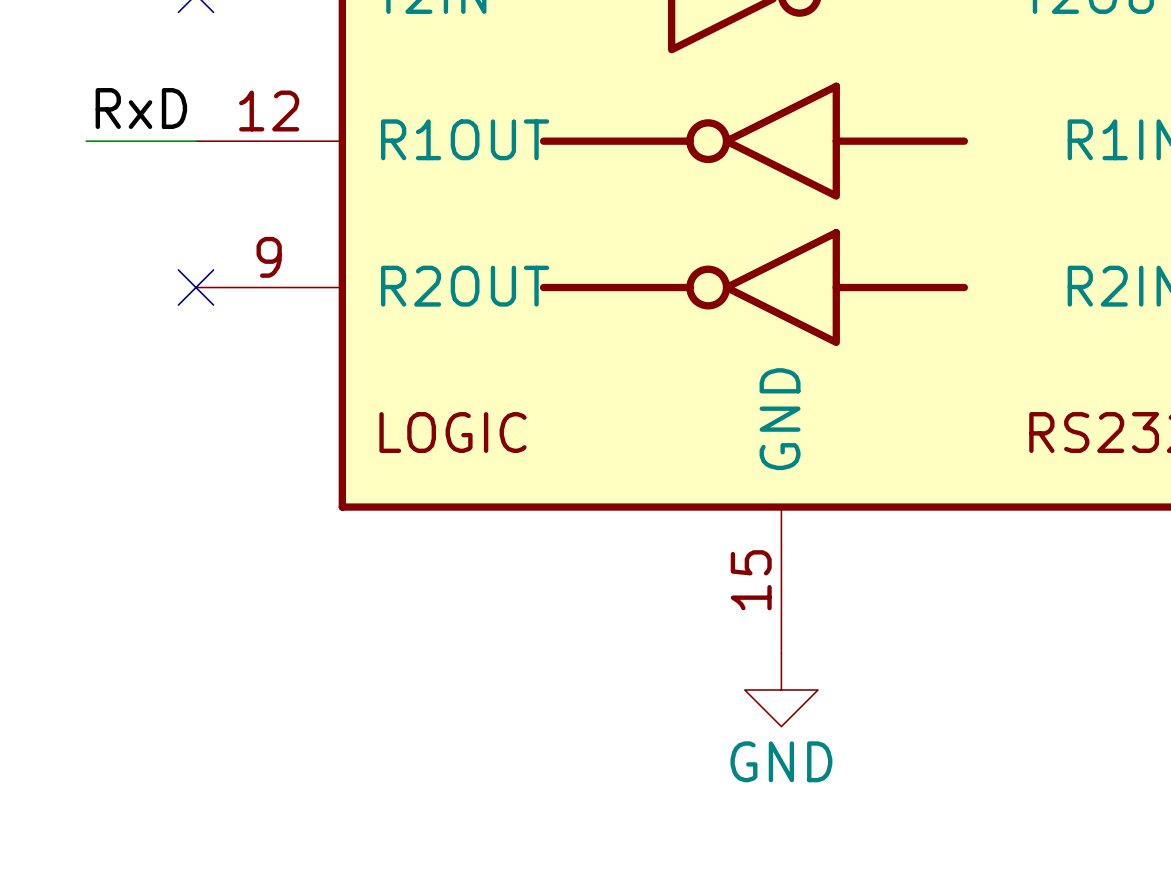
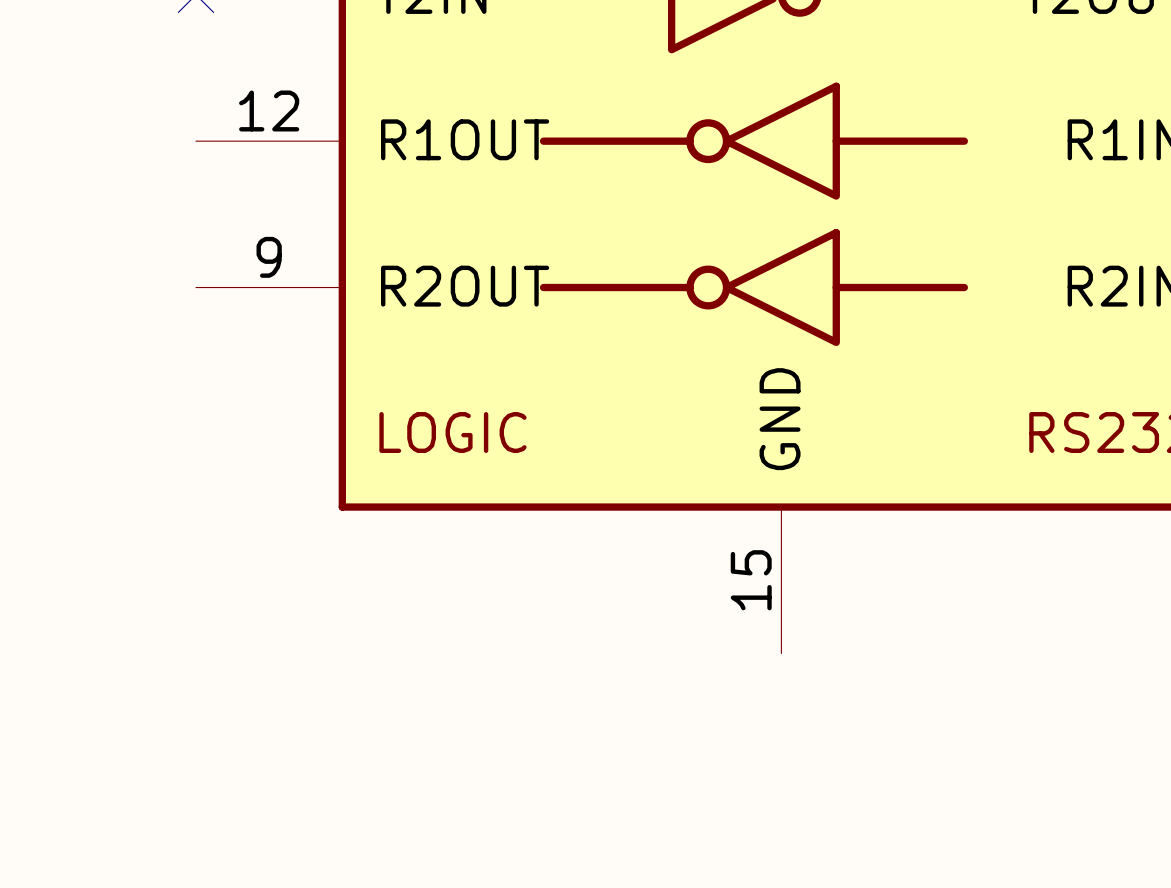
label: RxD (141, 108) -> none
wire: (86, 141) (195, 141) -> none
no-connect mark: (195, 287) -> none
power symbol: GND (781, 690) -> none

